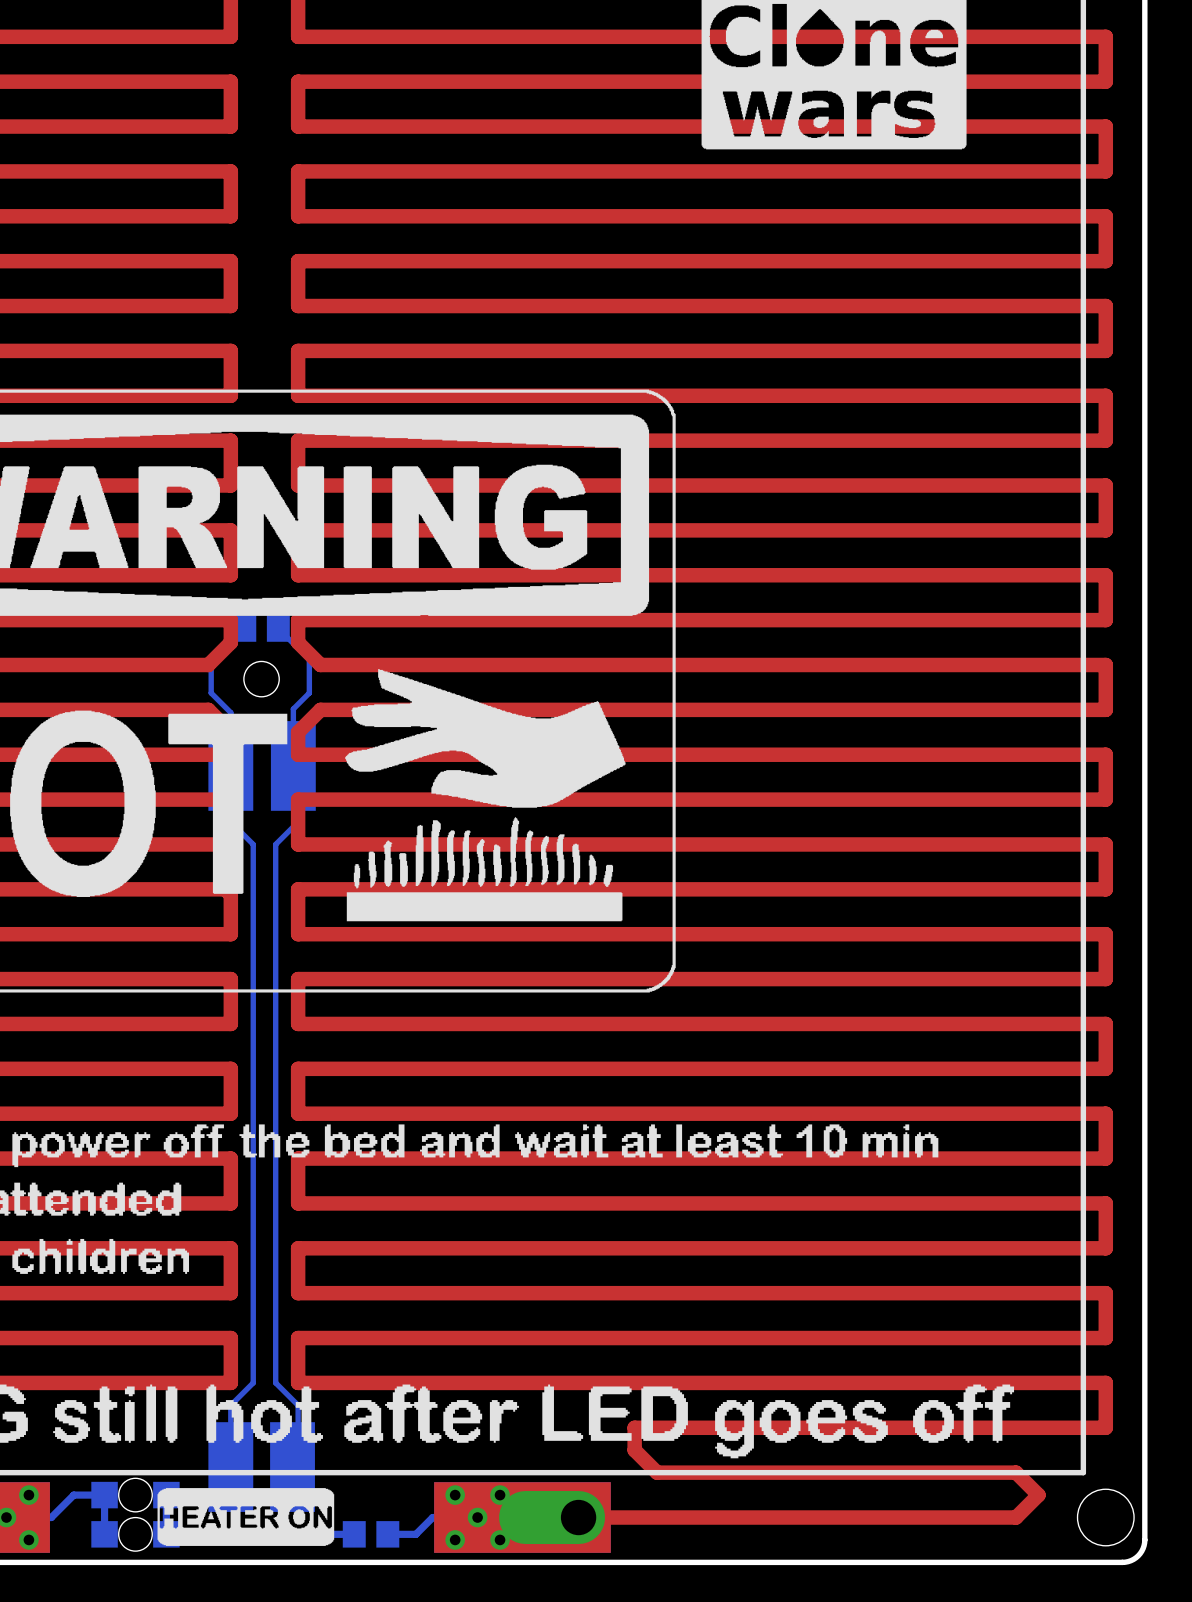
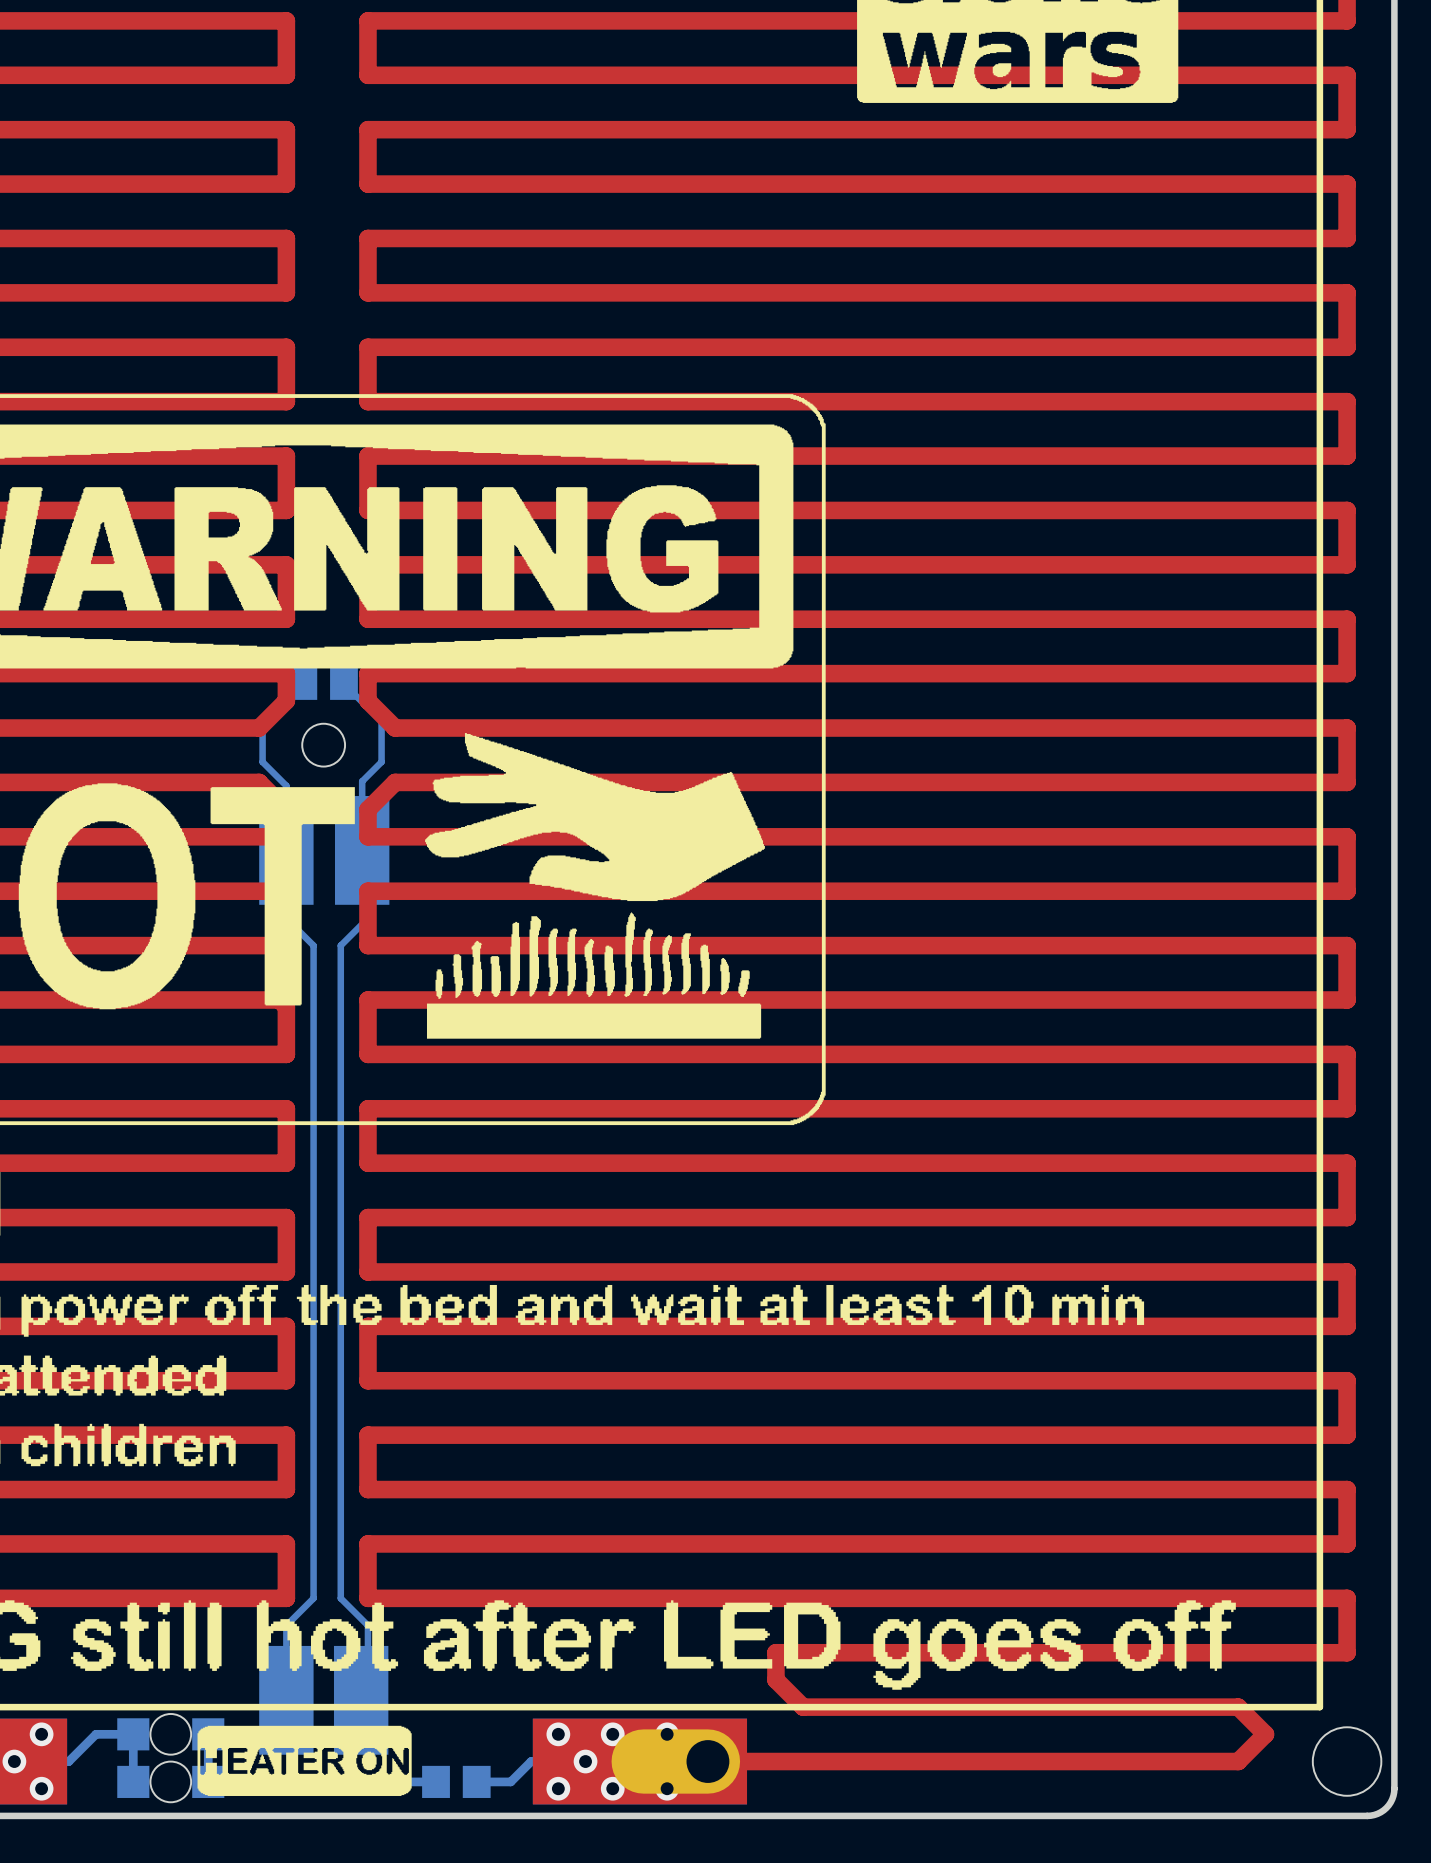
via: none -> (667, 1734)
via: none -> (667, 1788)

